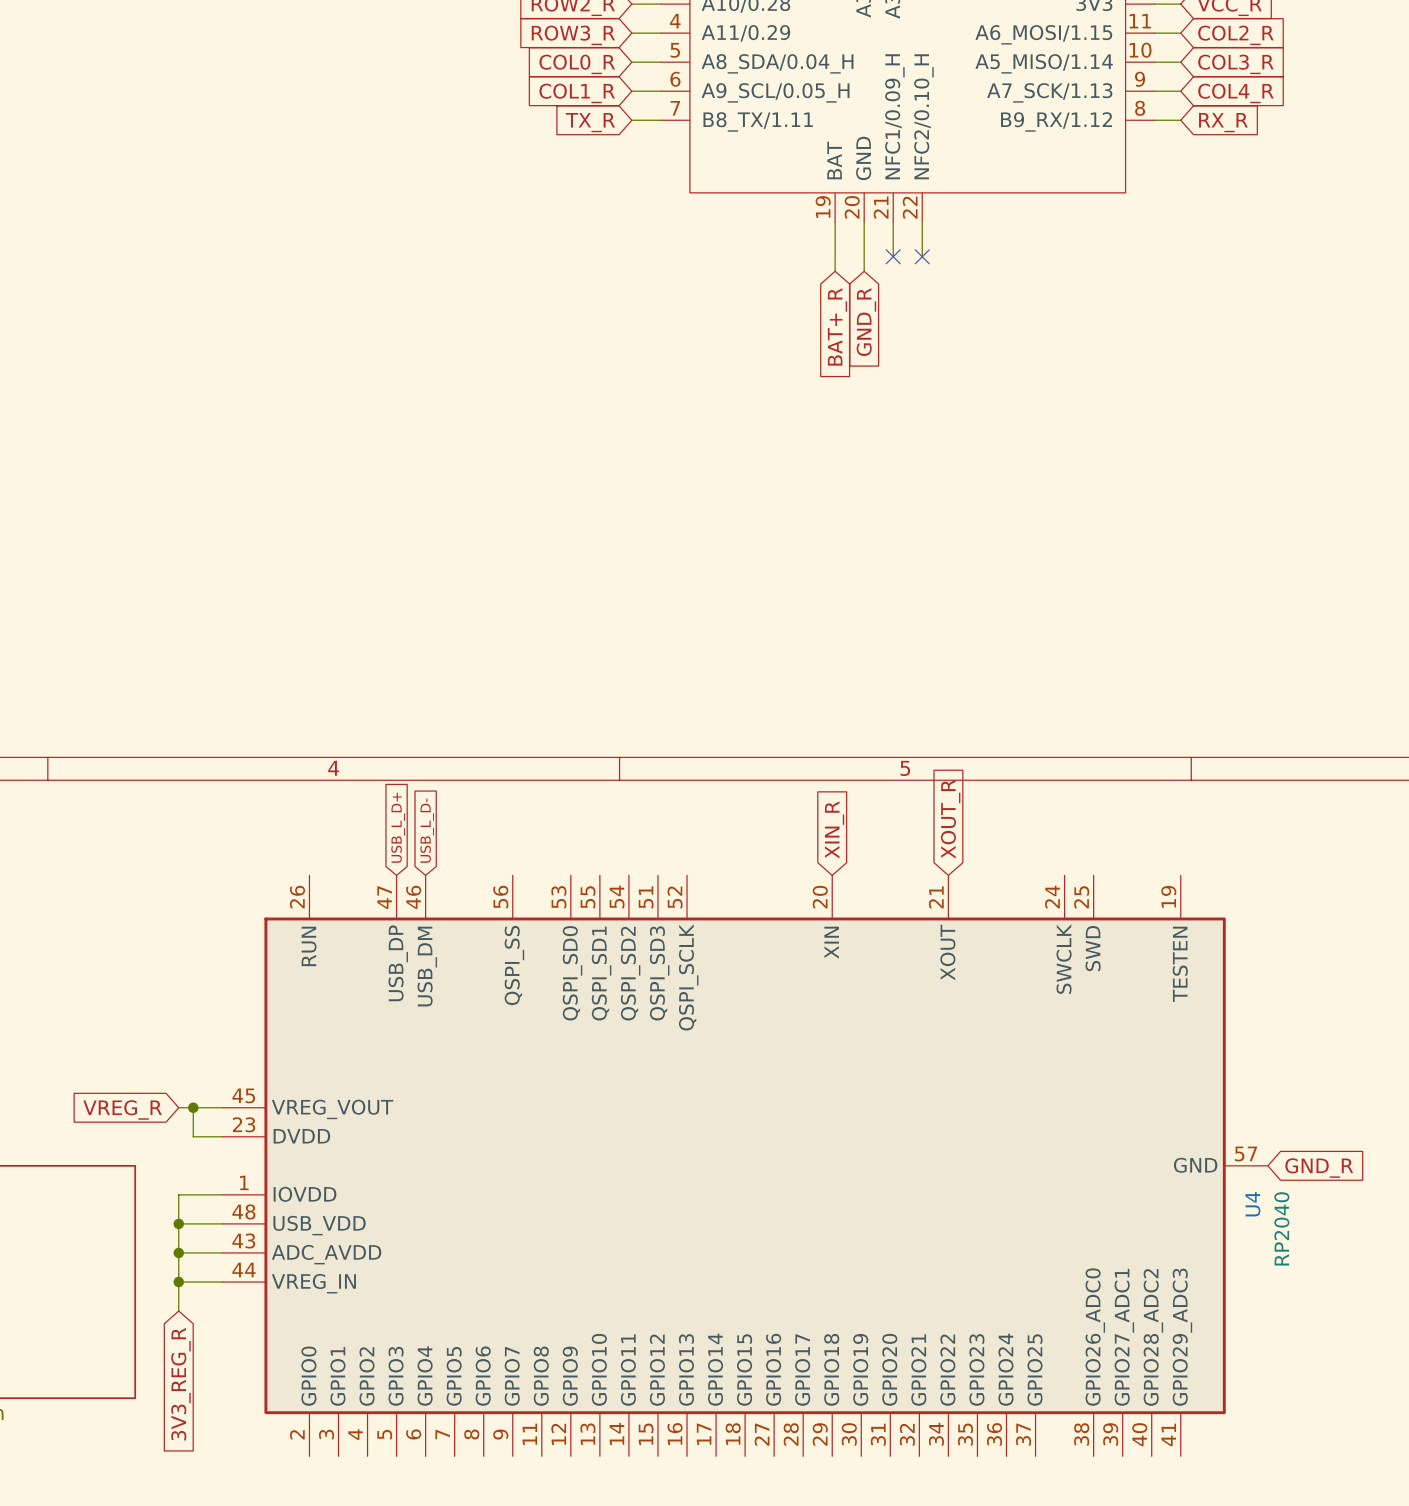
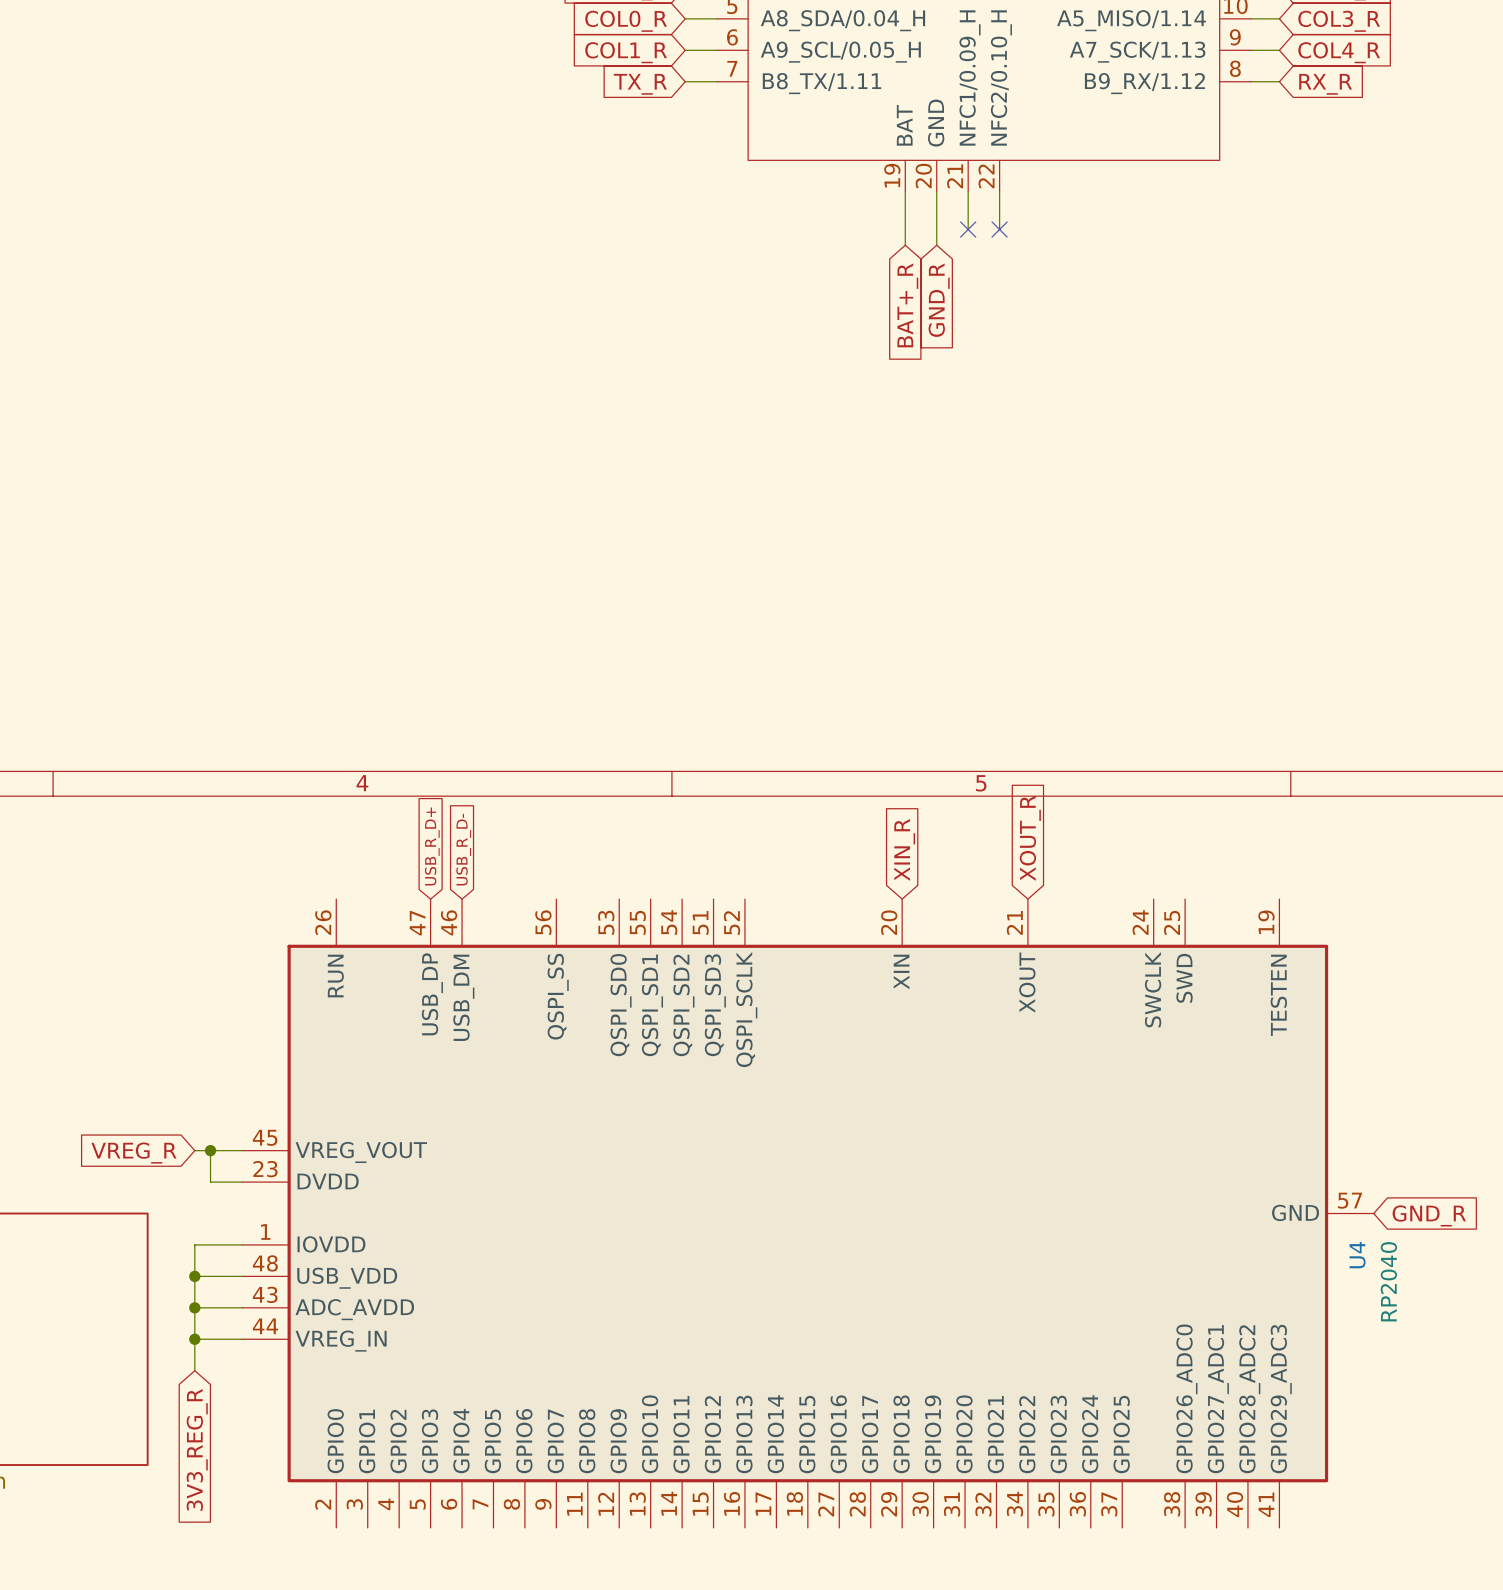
global label: USB_L_D+ (398, 827) -> USB_R_D+ (432, 846)
global label: USB_L_D- (427, 830) -> USB_R_D- (463, 849)

